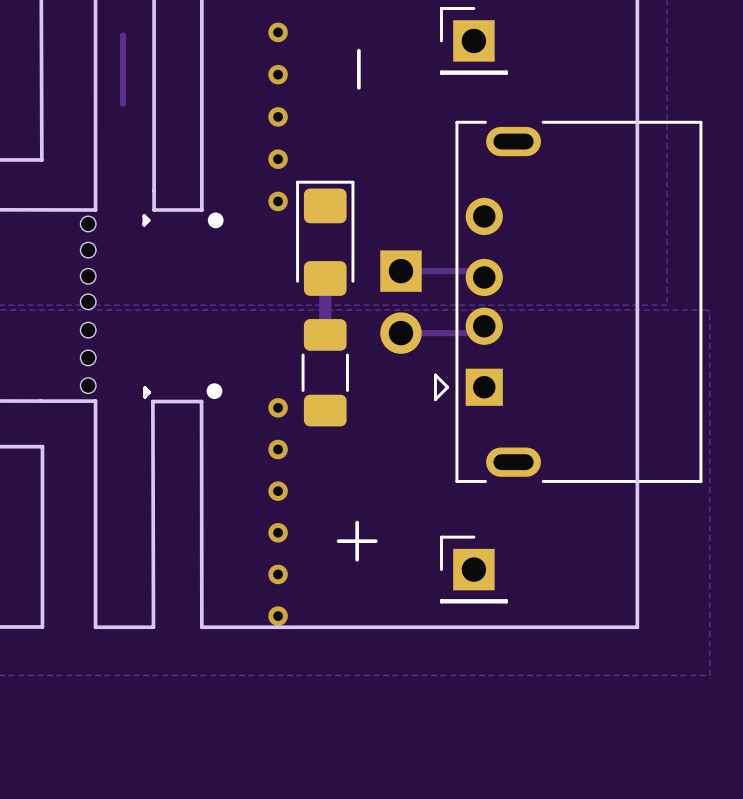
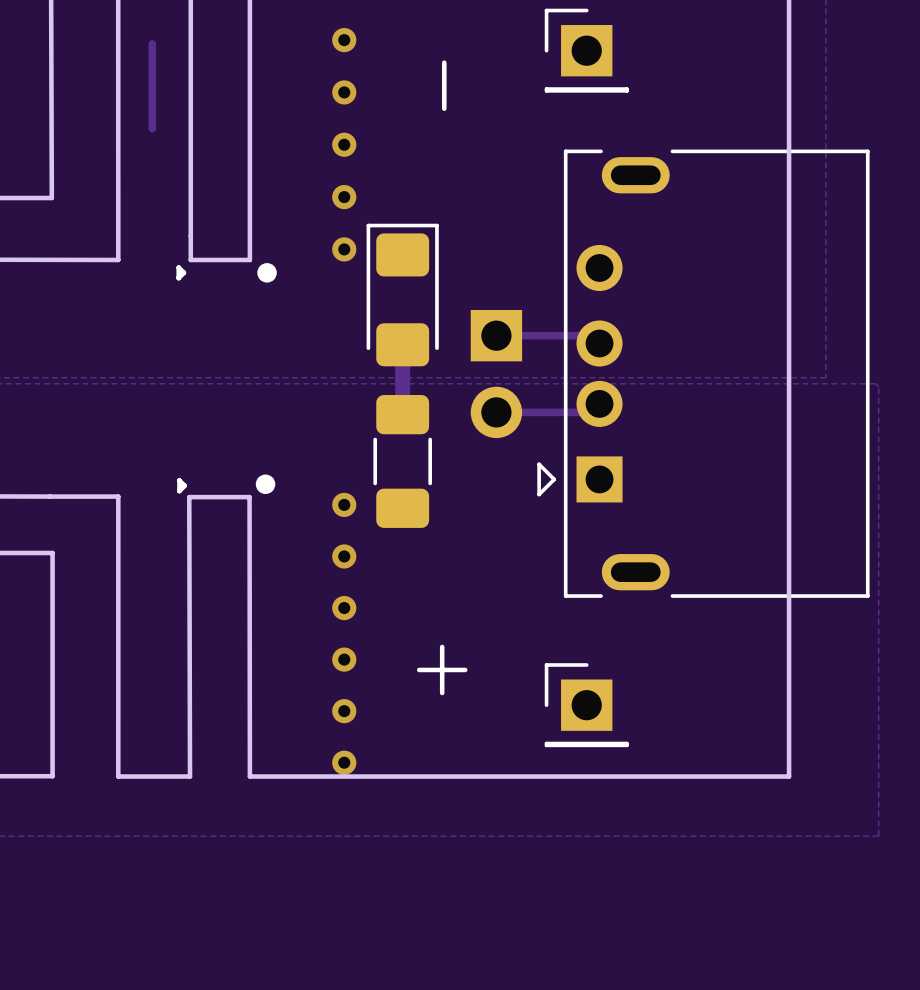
part: (88, 223) -> none
part: (88, 250) -> none
part: (88, 276) -> none
part: (88, 301) -> none
part: (88, 330) -> none
part: (88, 357) -> none
part: (88, 385) -> none

